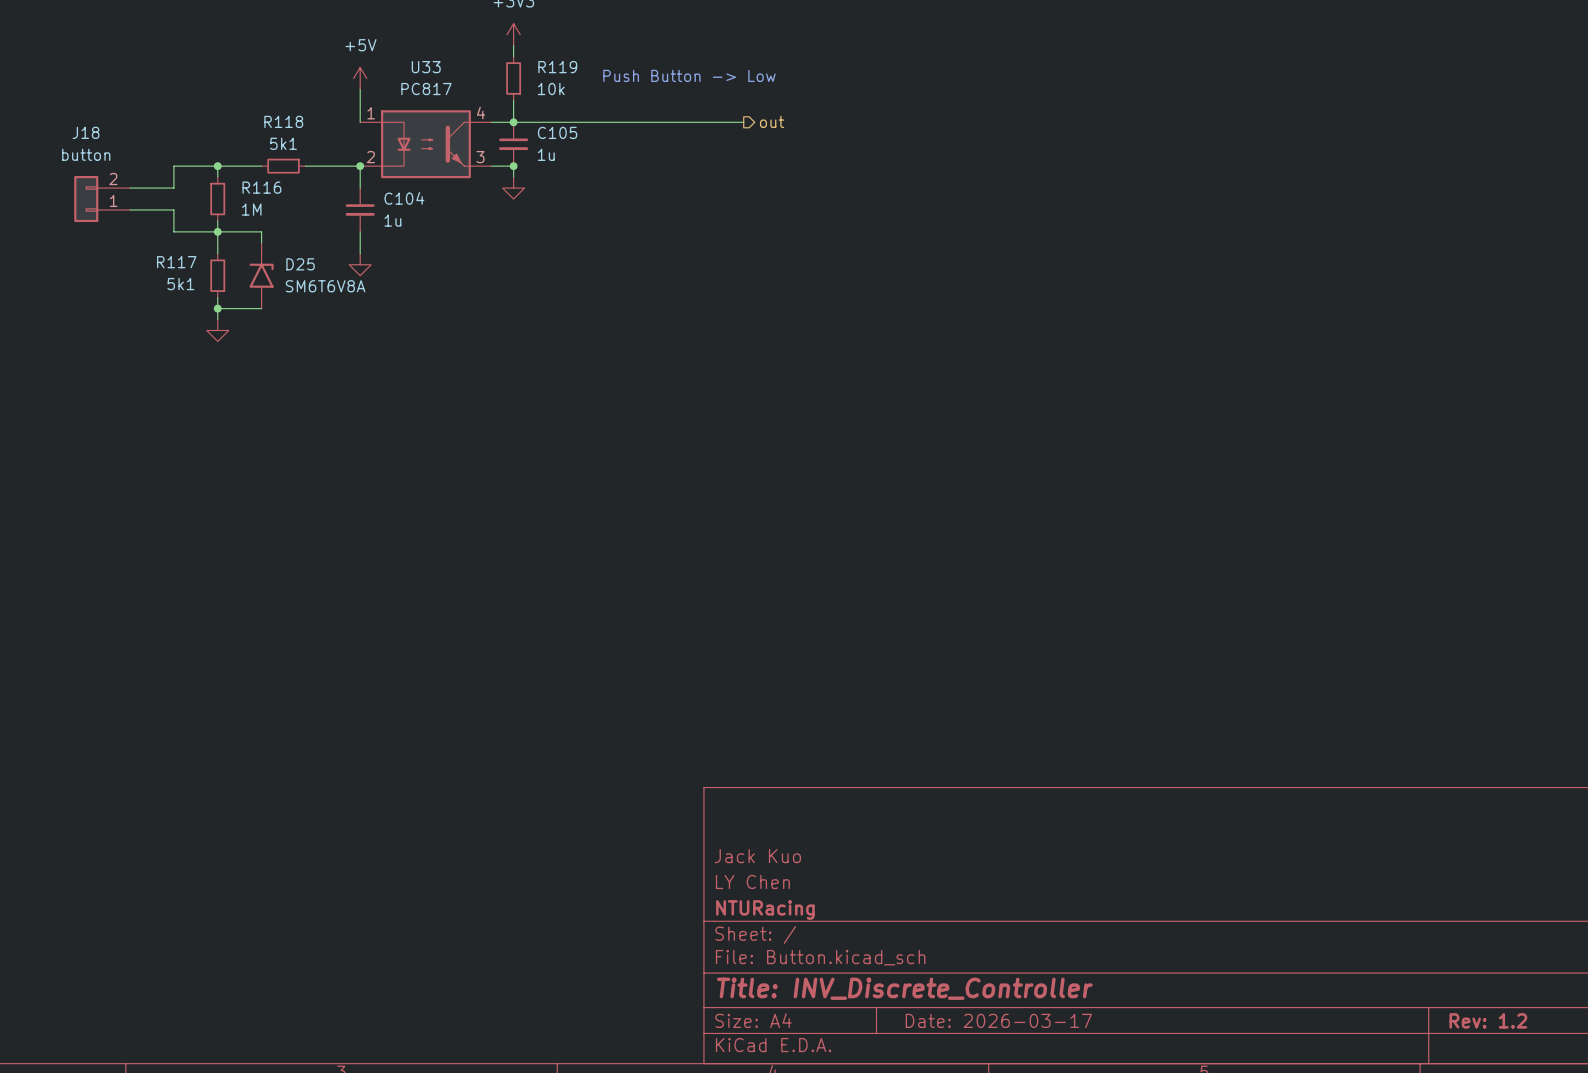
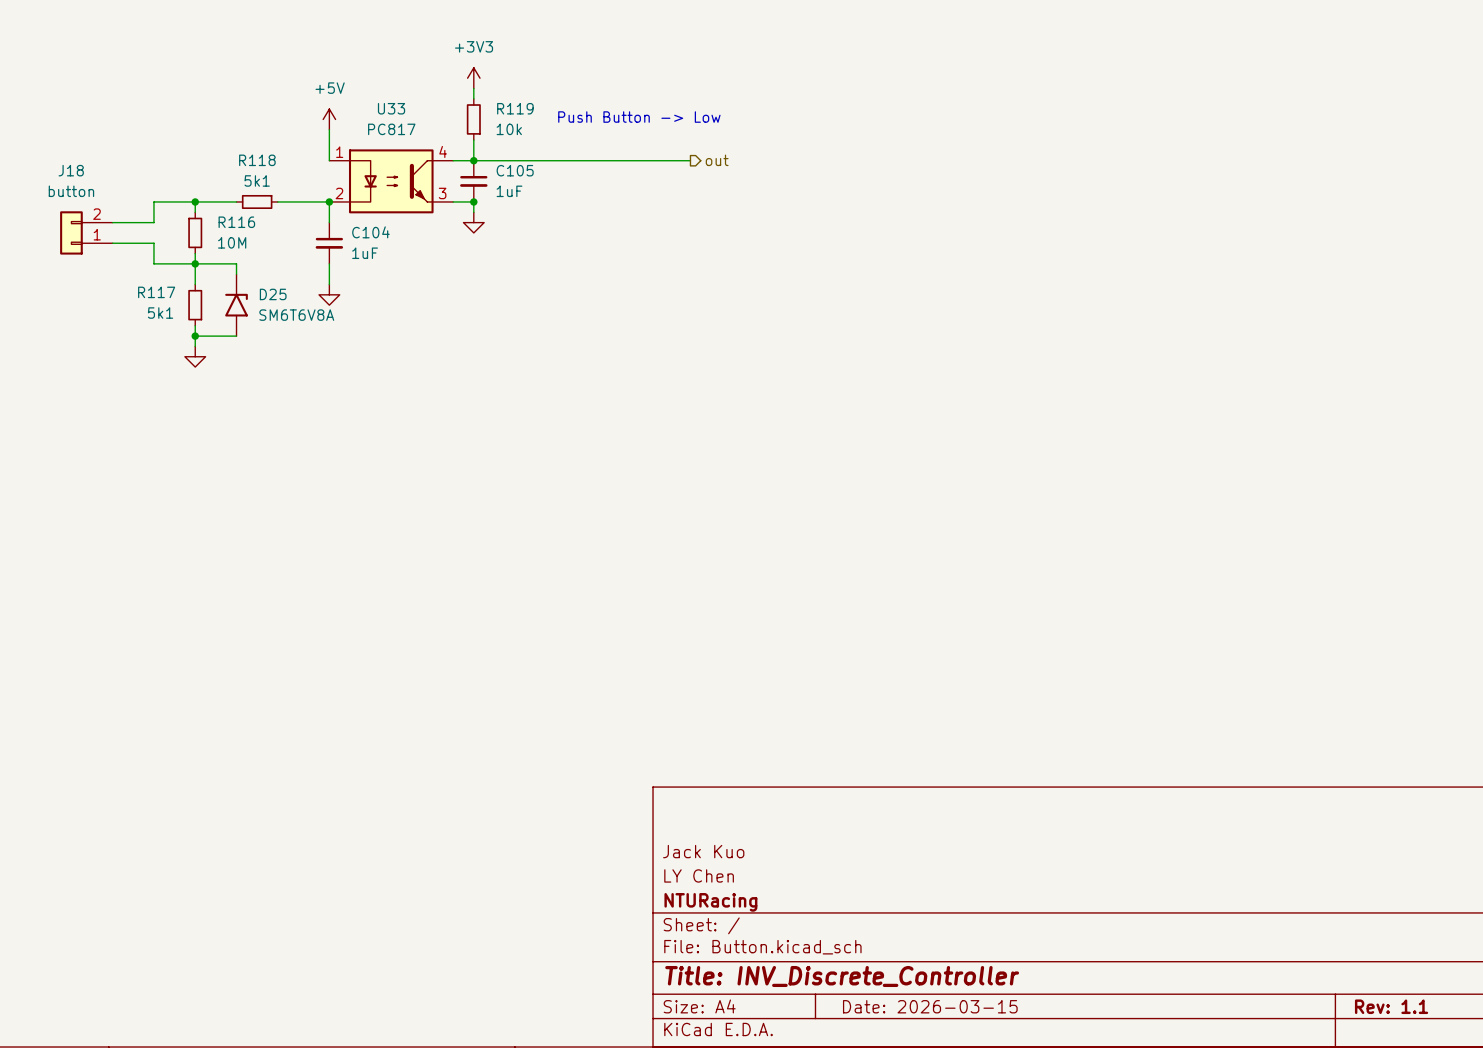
C105 value: 1u (546, 154) -> 1uF (509, 191)
R116 value: 1M (251, 209) -> 10M (232, 242)
C104 value: 1u (392, 220) -> 1uF (365, 253)
title block: Date: 2026-03-17 (998, 1020) -> Date: 2026-03-15 (930, 1006)
title block: Rev: 1.2 (1488, 1020) -> Rev: 1.1 (1391, 1006)

